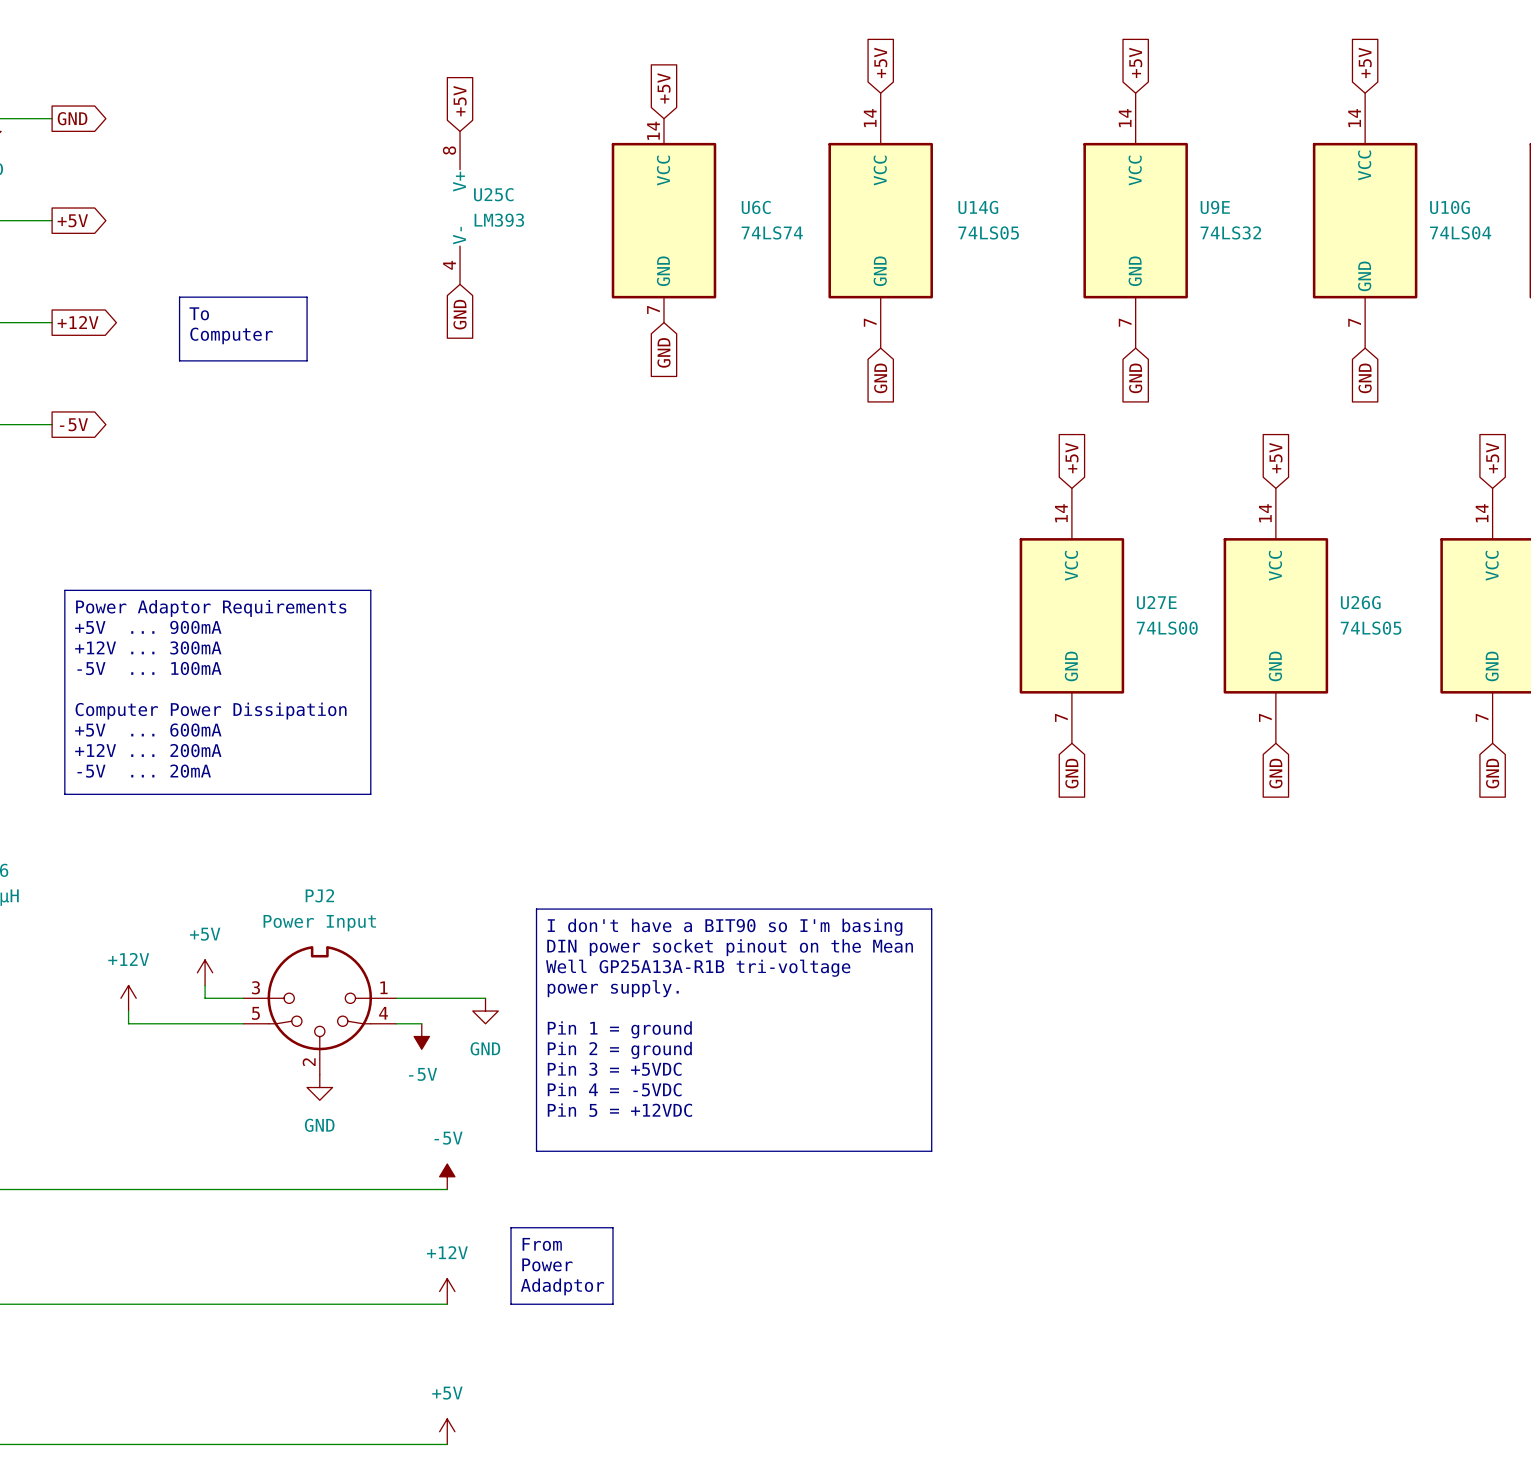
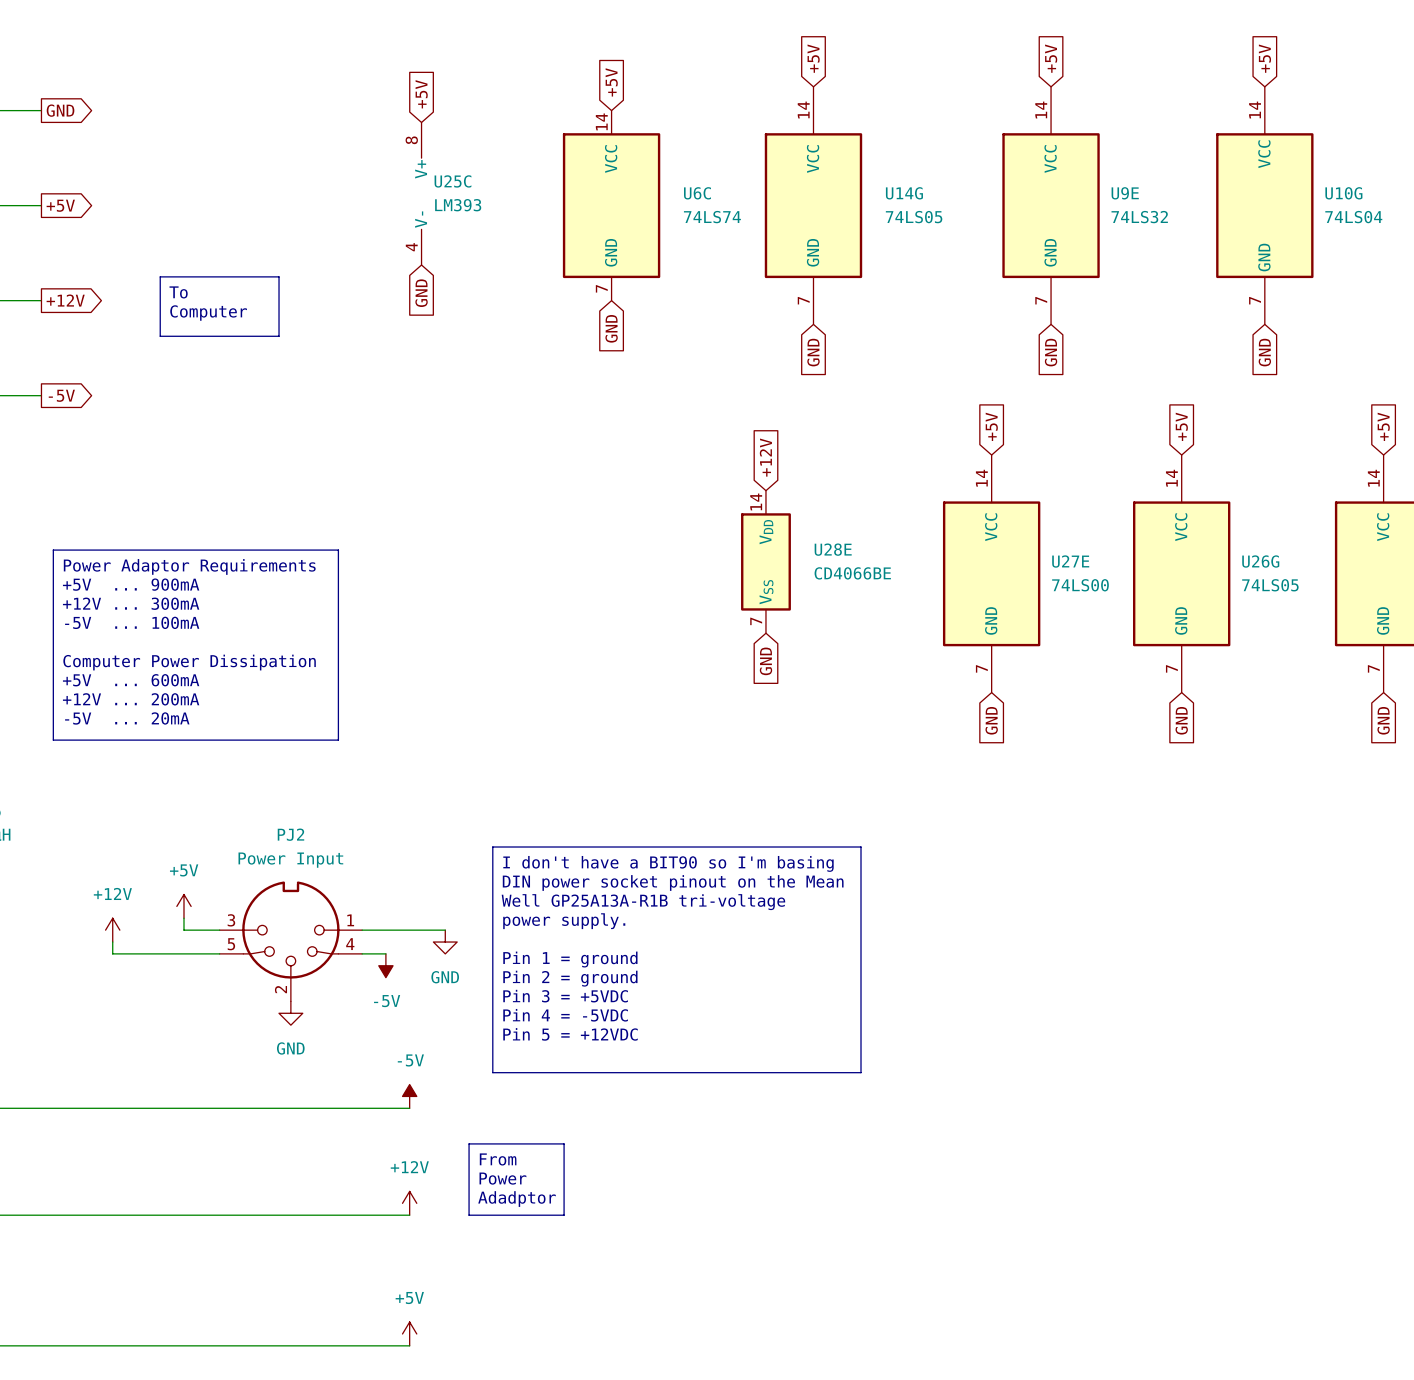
global label: none -> +12V (765, 457)
U28E: none -> CD4066BE (765, 561)
global label: none -> GND (765, 661)

